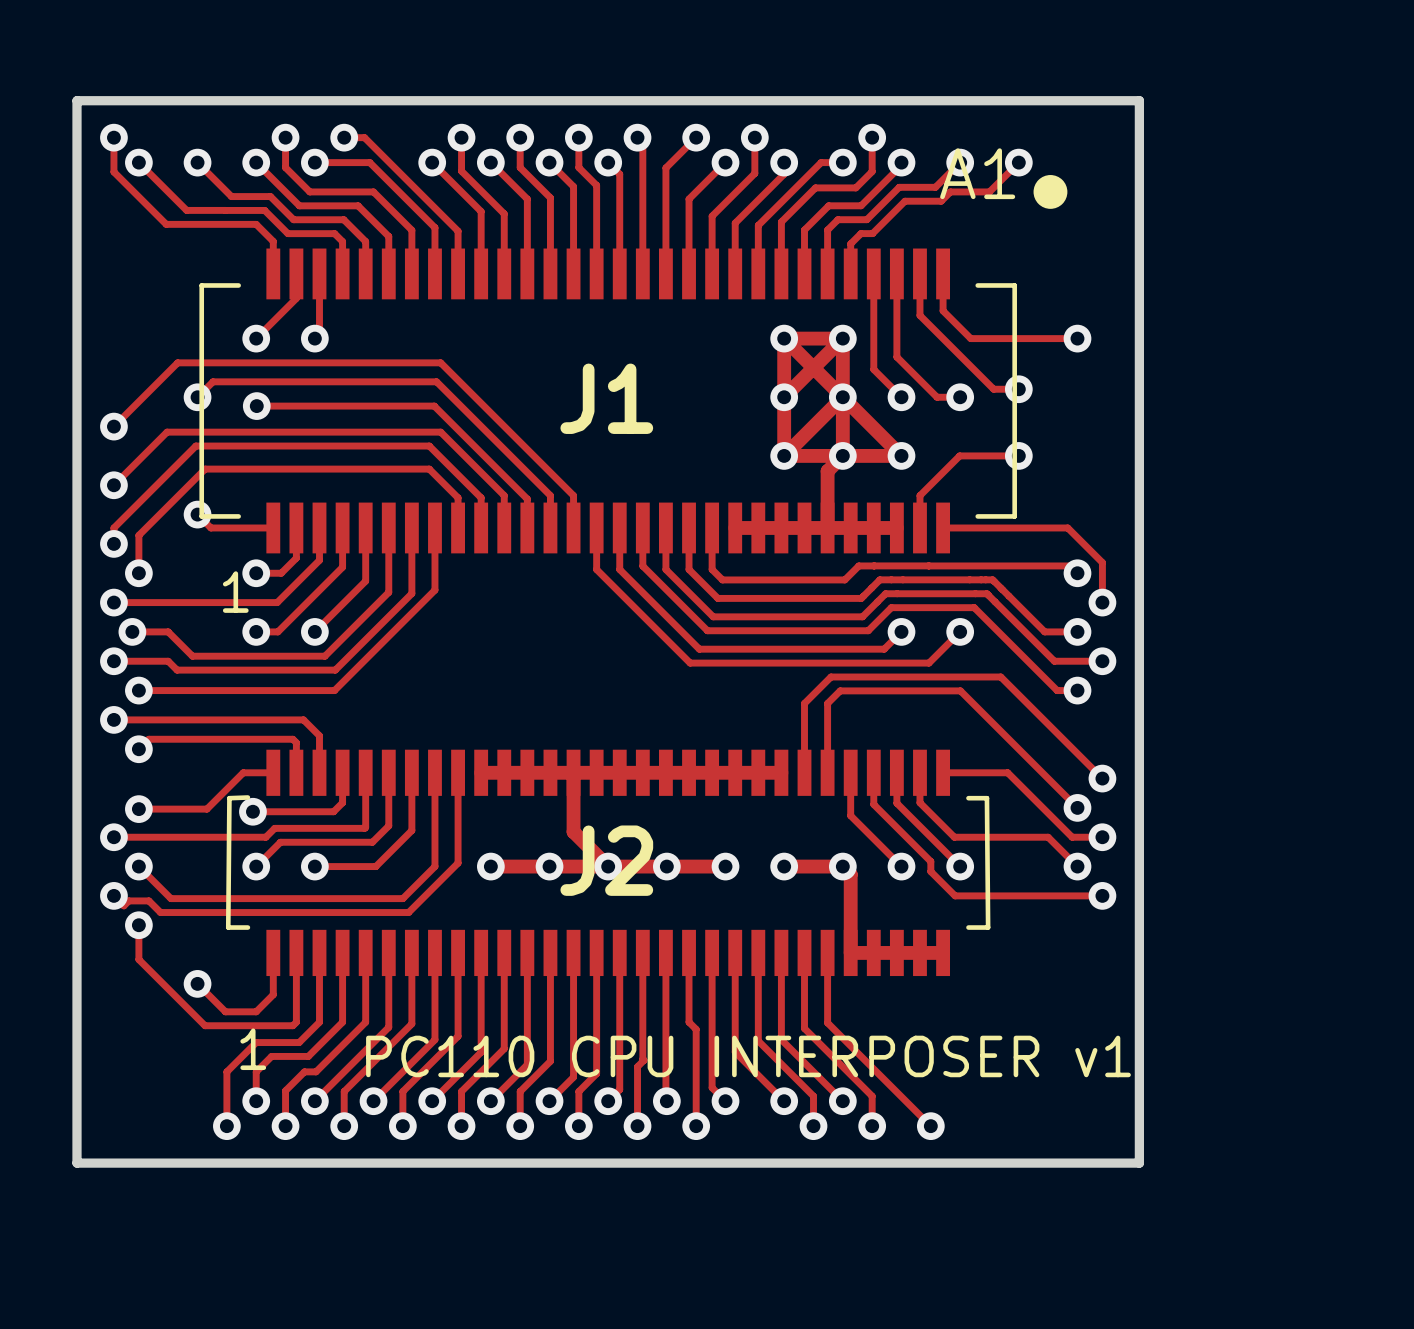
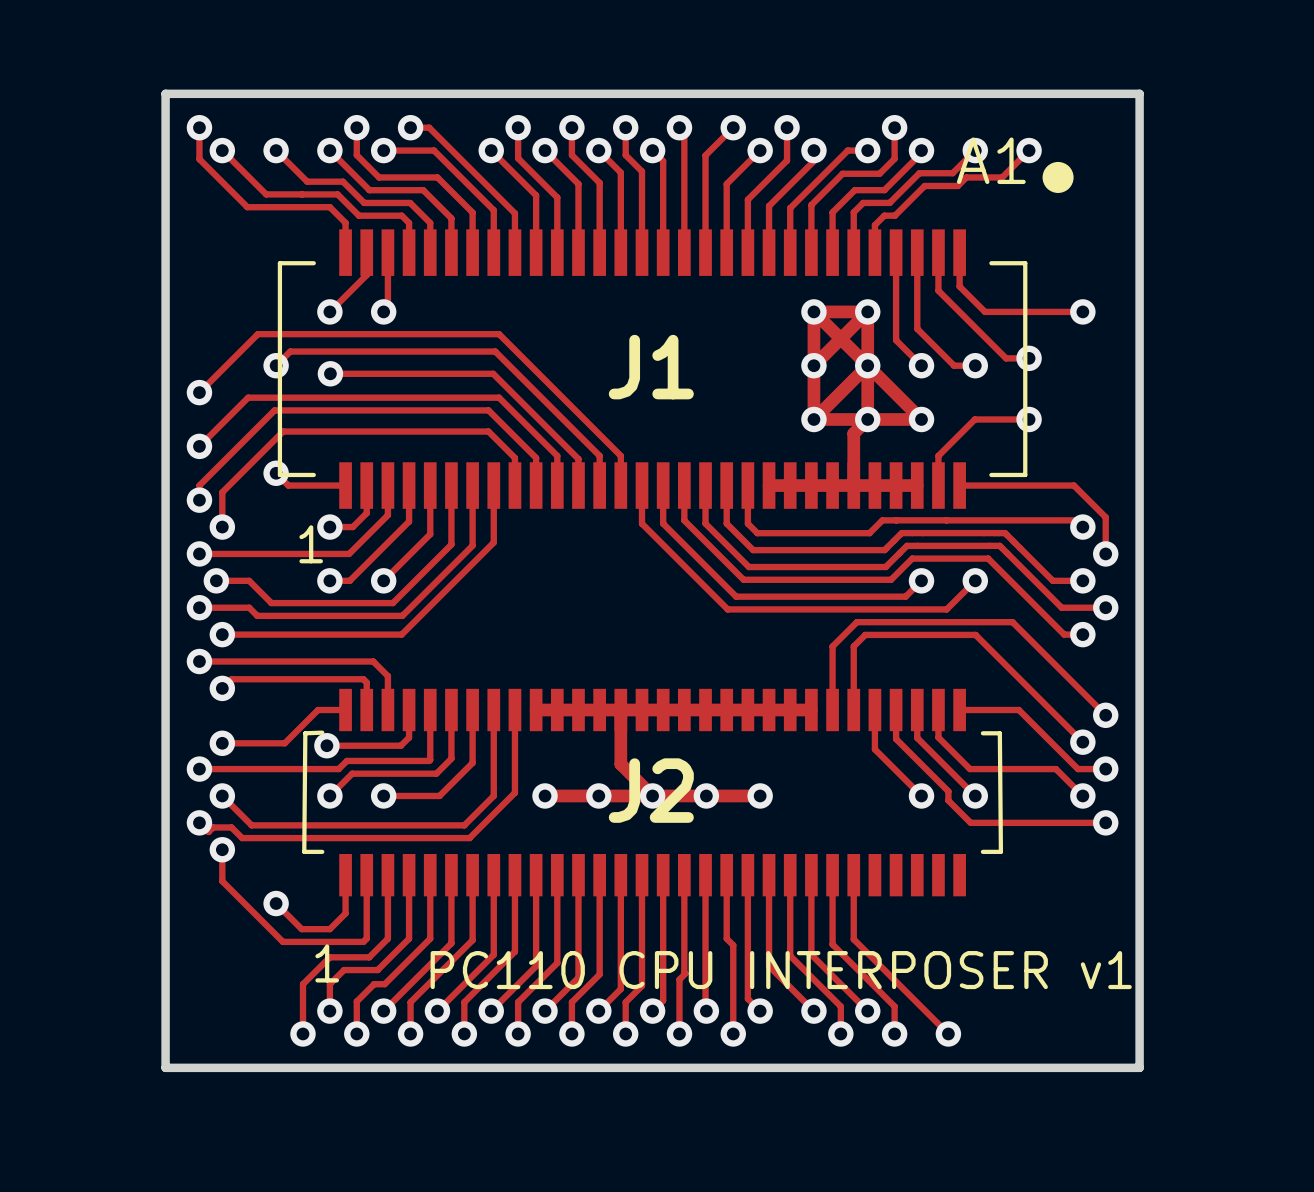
track: (784, 866) (842, 866) (850, 874) (850, 952) (943, 952) -> none
via: (784, 866) -> none
via: (842, 866) -> none

